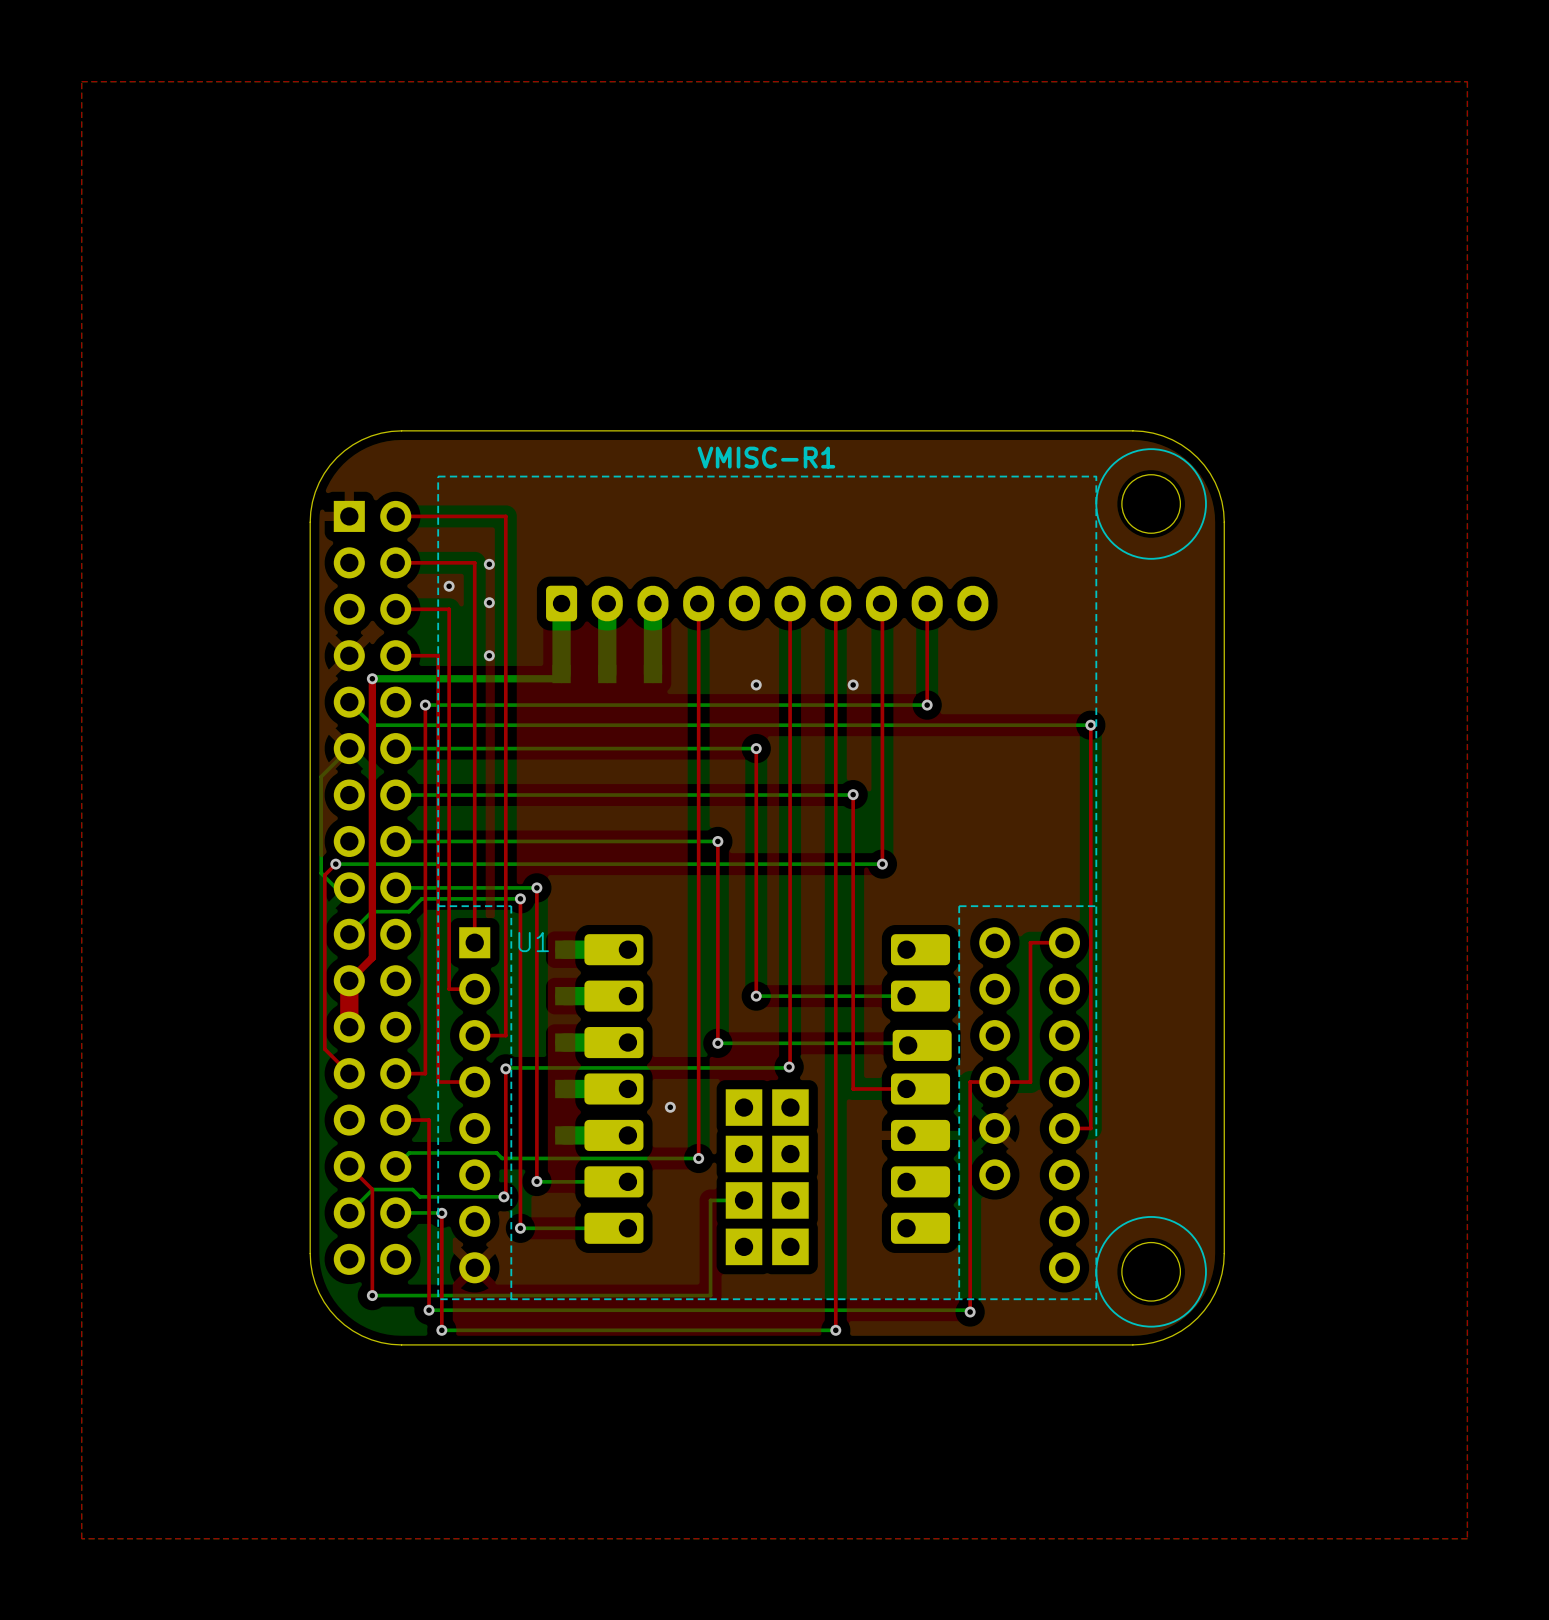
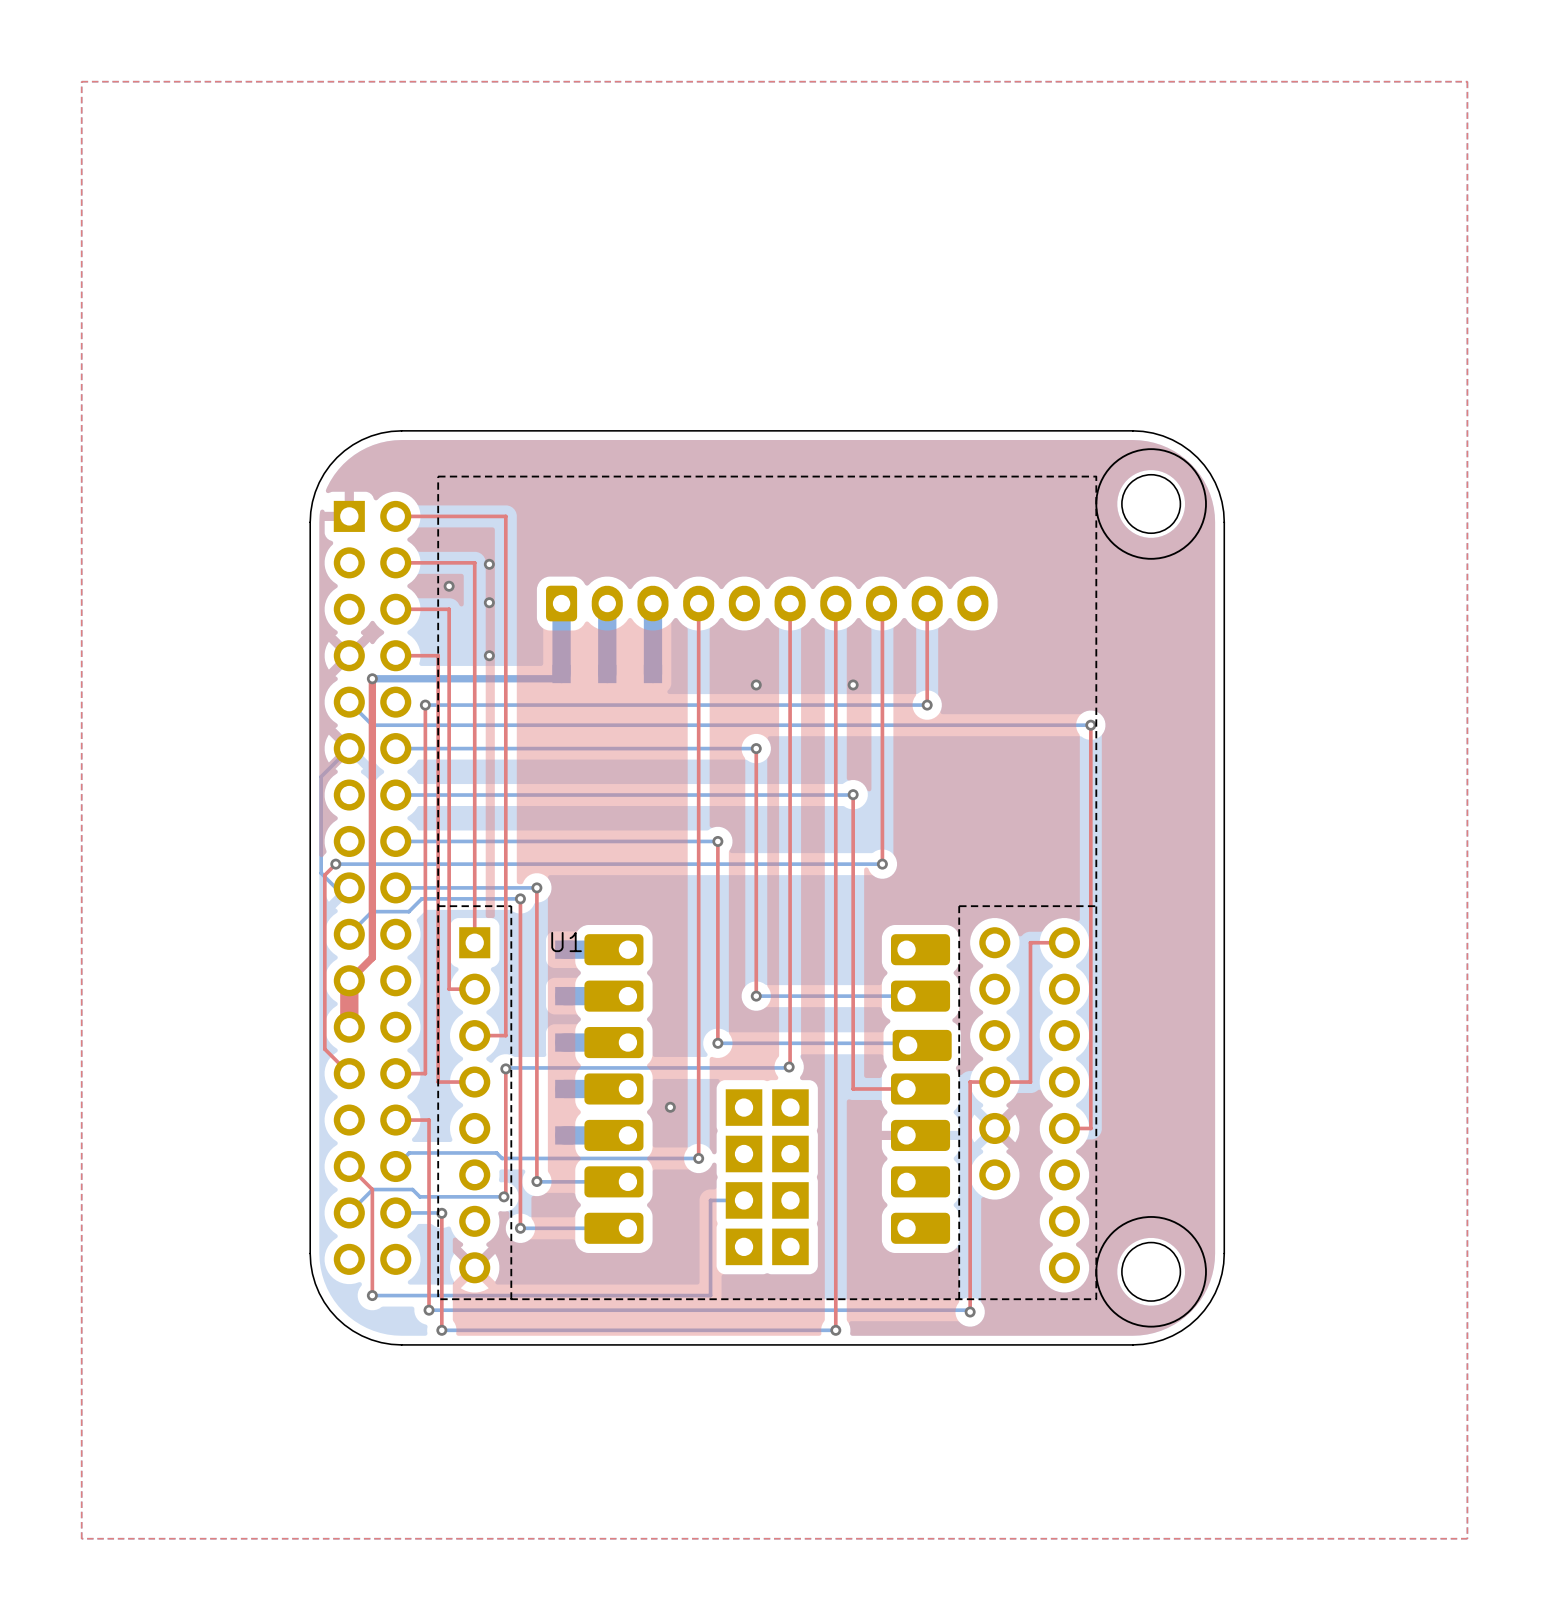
text: VMISC-R1 (766, 457) -> none
U1 name position: U1 (533, 942) -> U1 (566, 942)

